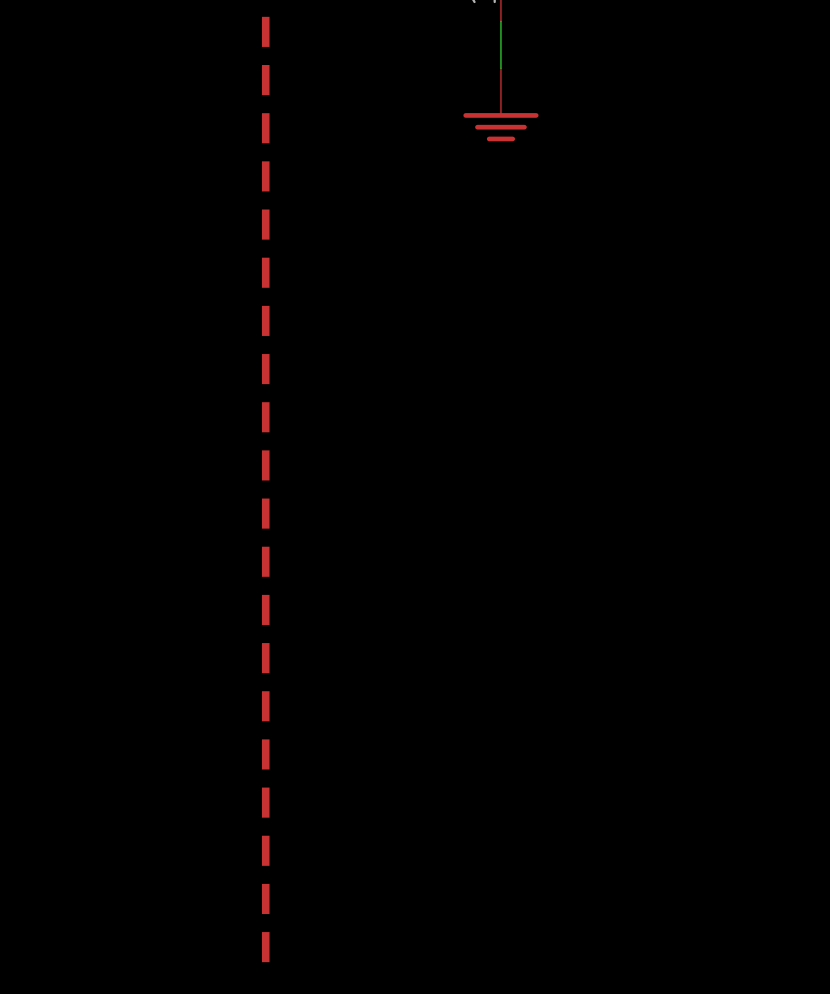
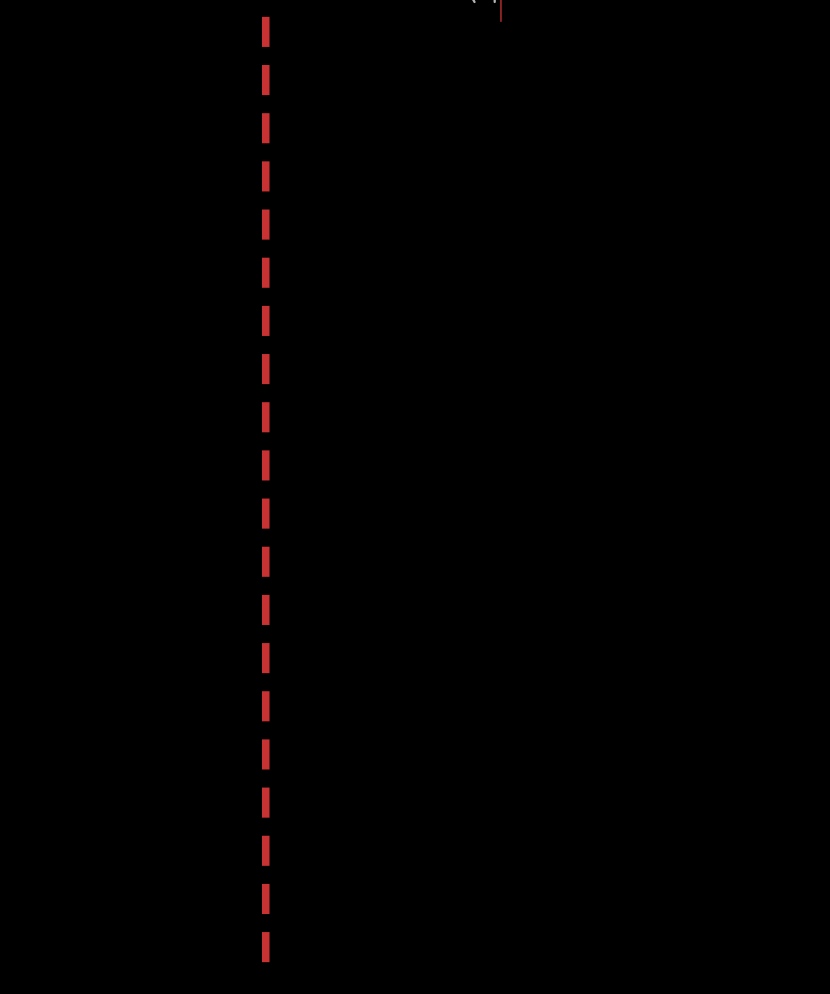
wire: (500, 21) (500, 68) -> none
power symbol: (500, 104) -> none

